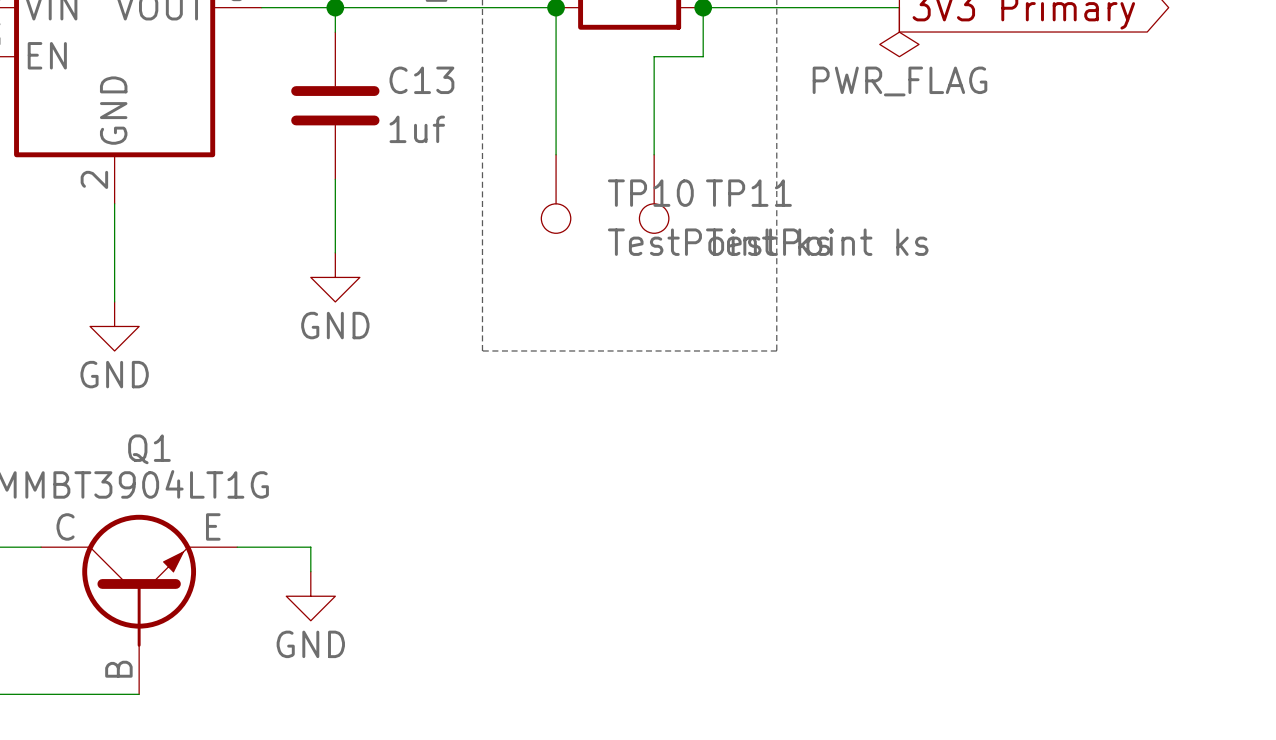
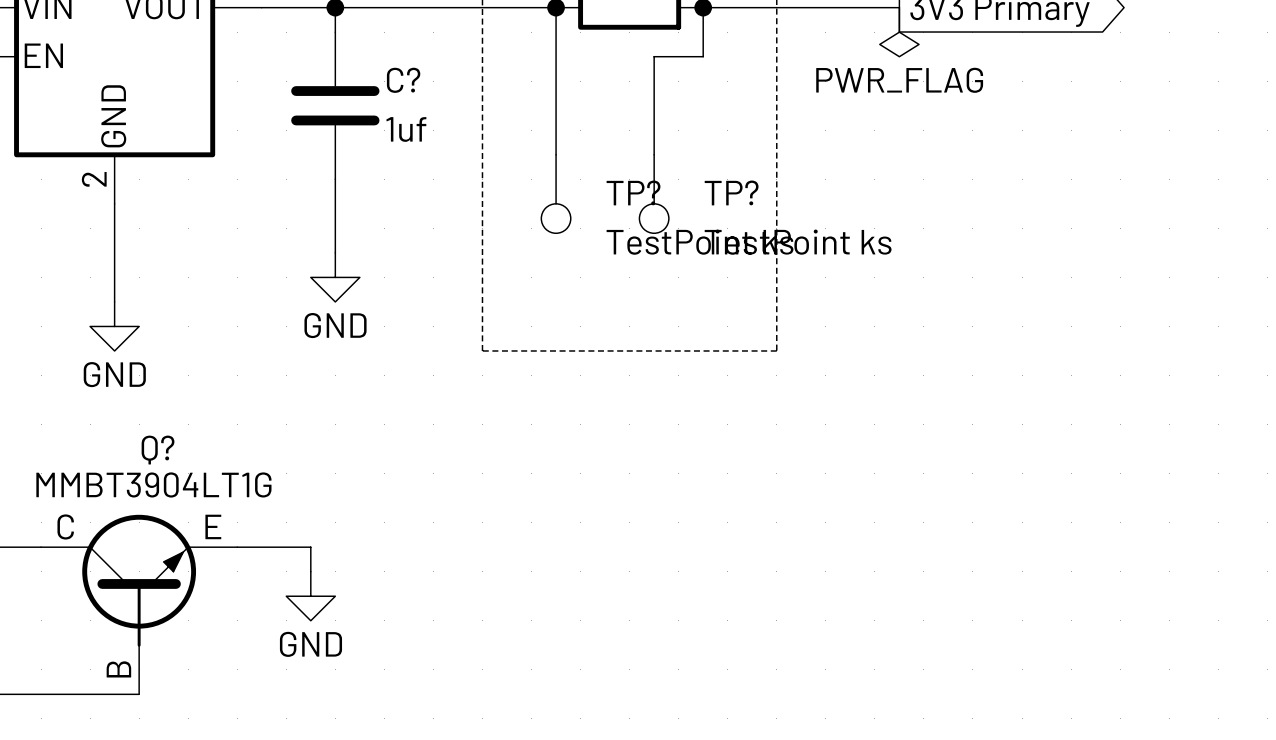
C13 name: C13 (421, 80) -> C? (403, 80)
TP10 name: TP10 (650, 193) -> TP? (633, 192)
TP11 name: TP11 (748, 193) -> TP? (731, 192)
Q1 name: Q1 (149, 449) -> Q? (158, 450)

